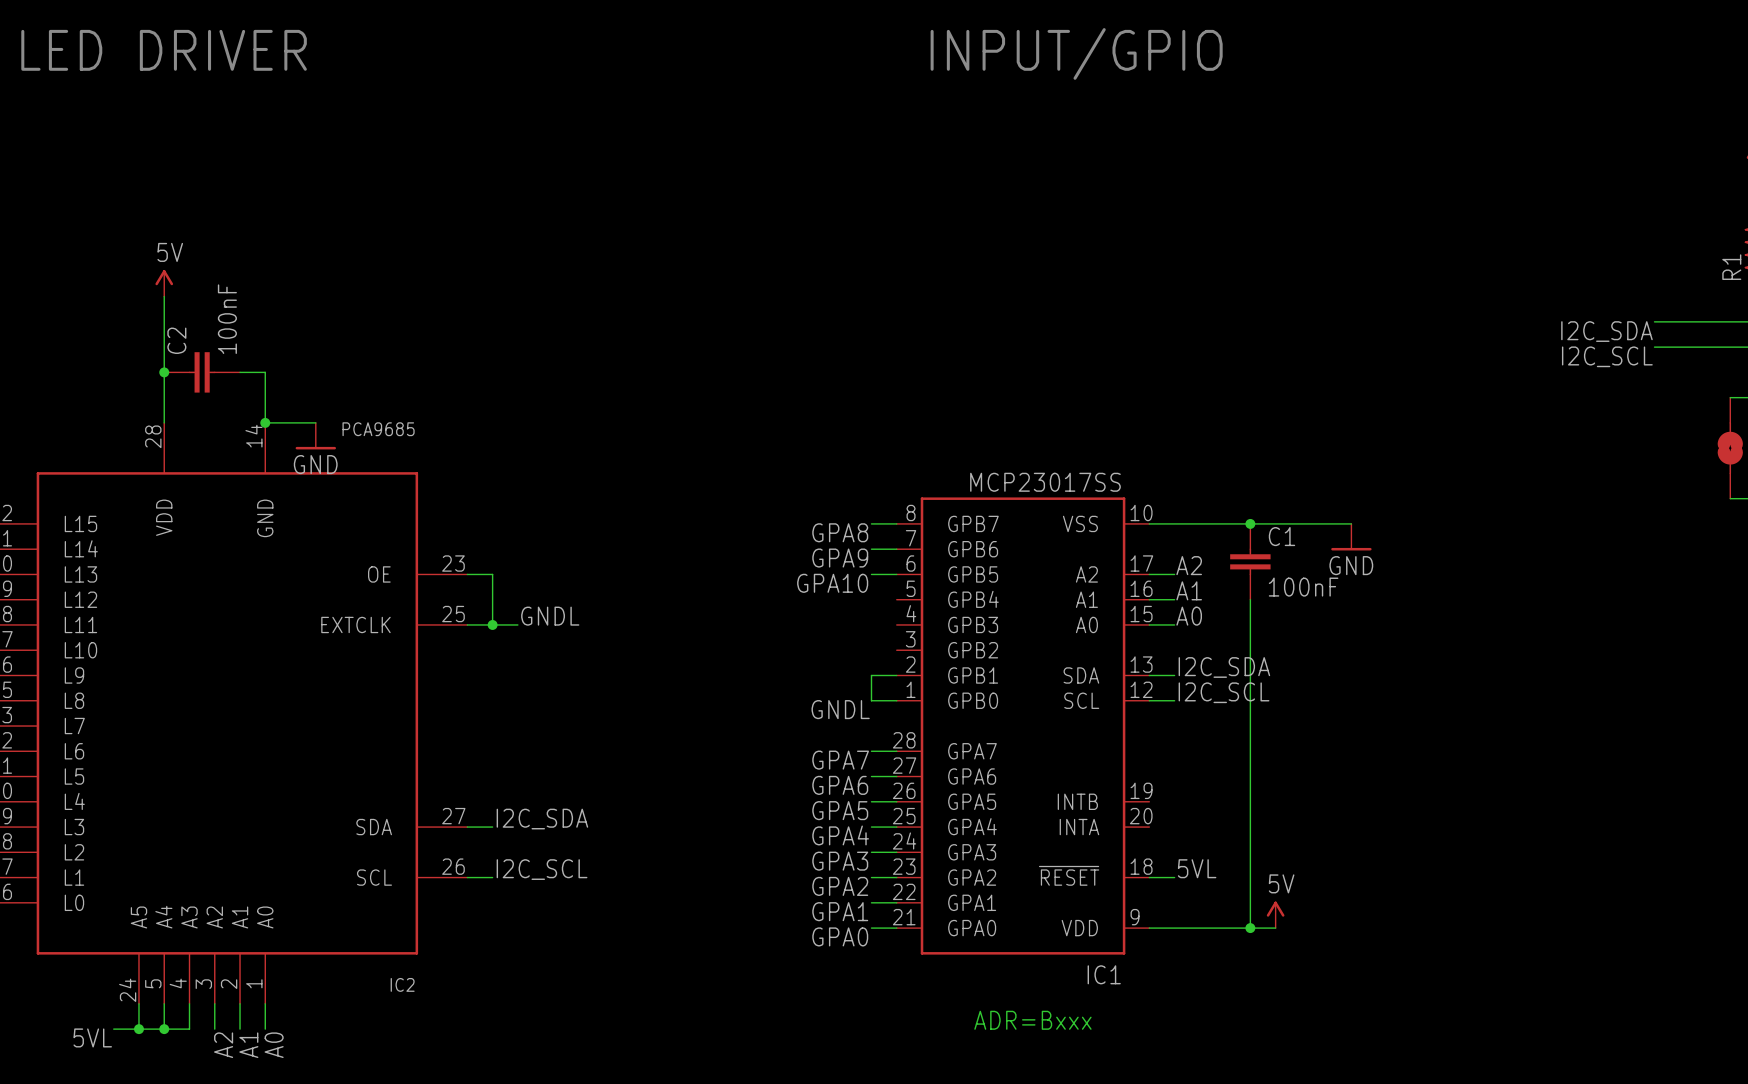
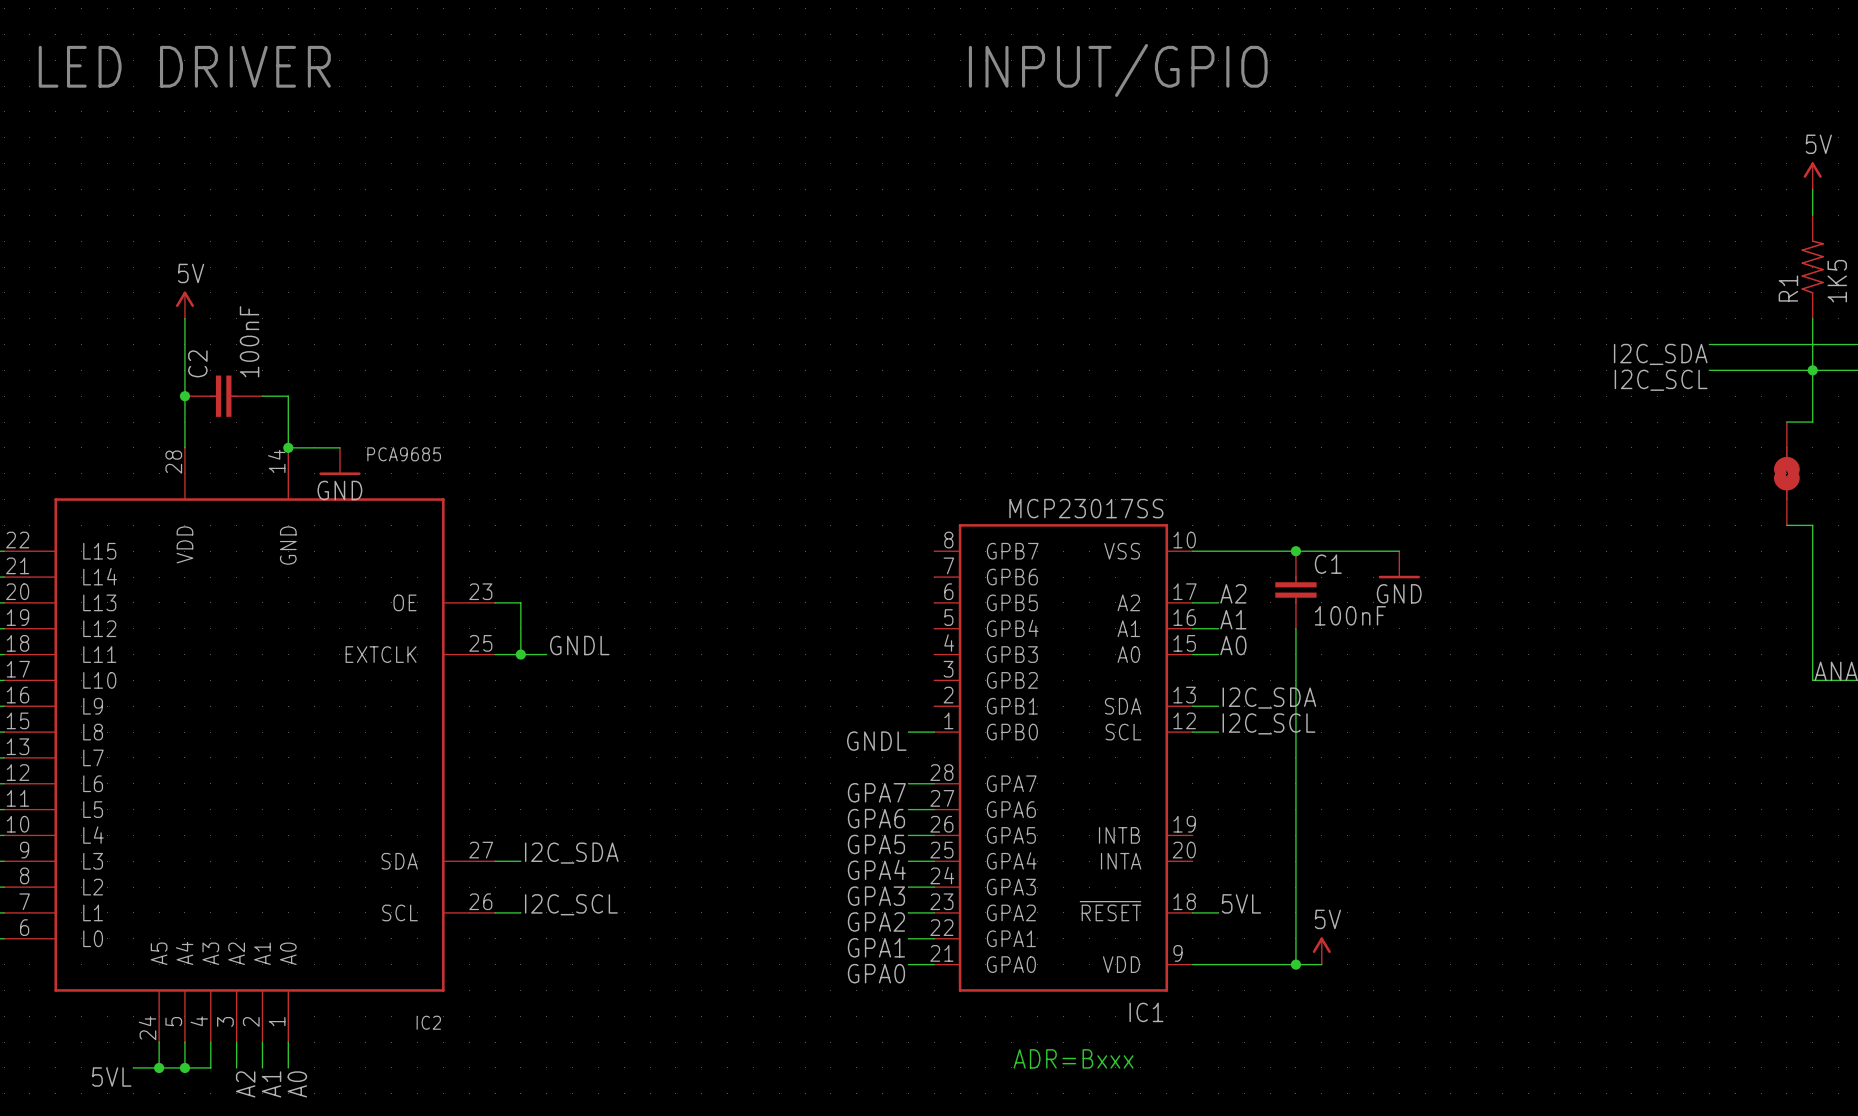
wire: (871, 523) (896, 523) -> none
label: GPA8 (840, 532) -> none
wire: (871, 549) (896, 549) -> none
label: GPA9 (840, 558) -> none
wire: (871, 574) (896, 574) -> none
label: GPA10 (832, 583) -> none
wire: (896, 675) (871, 675) (871, 700) -> none

